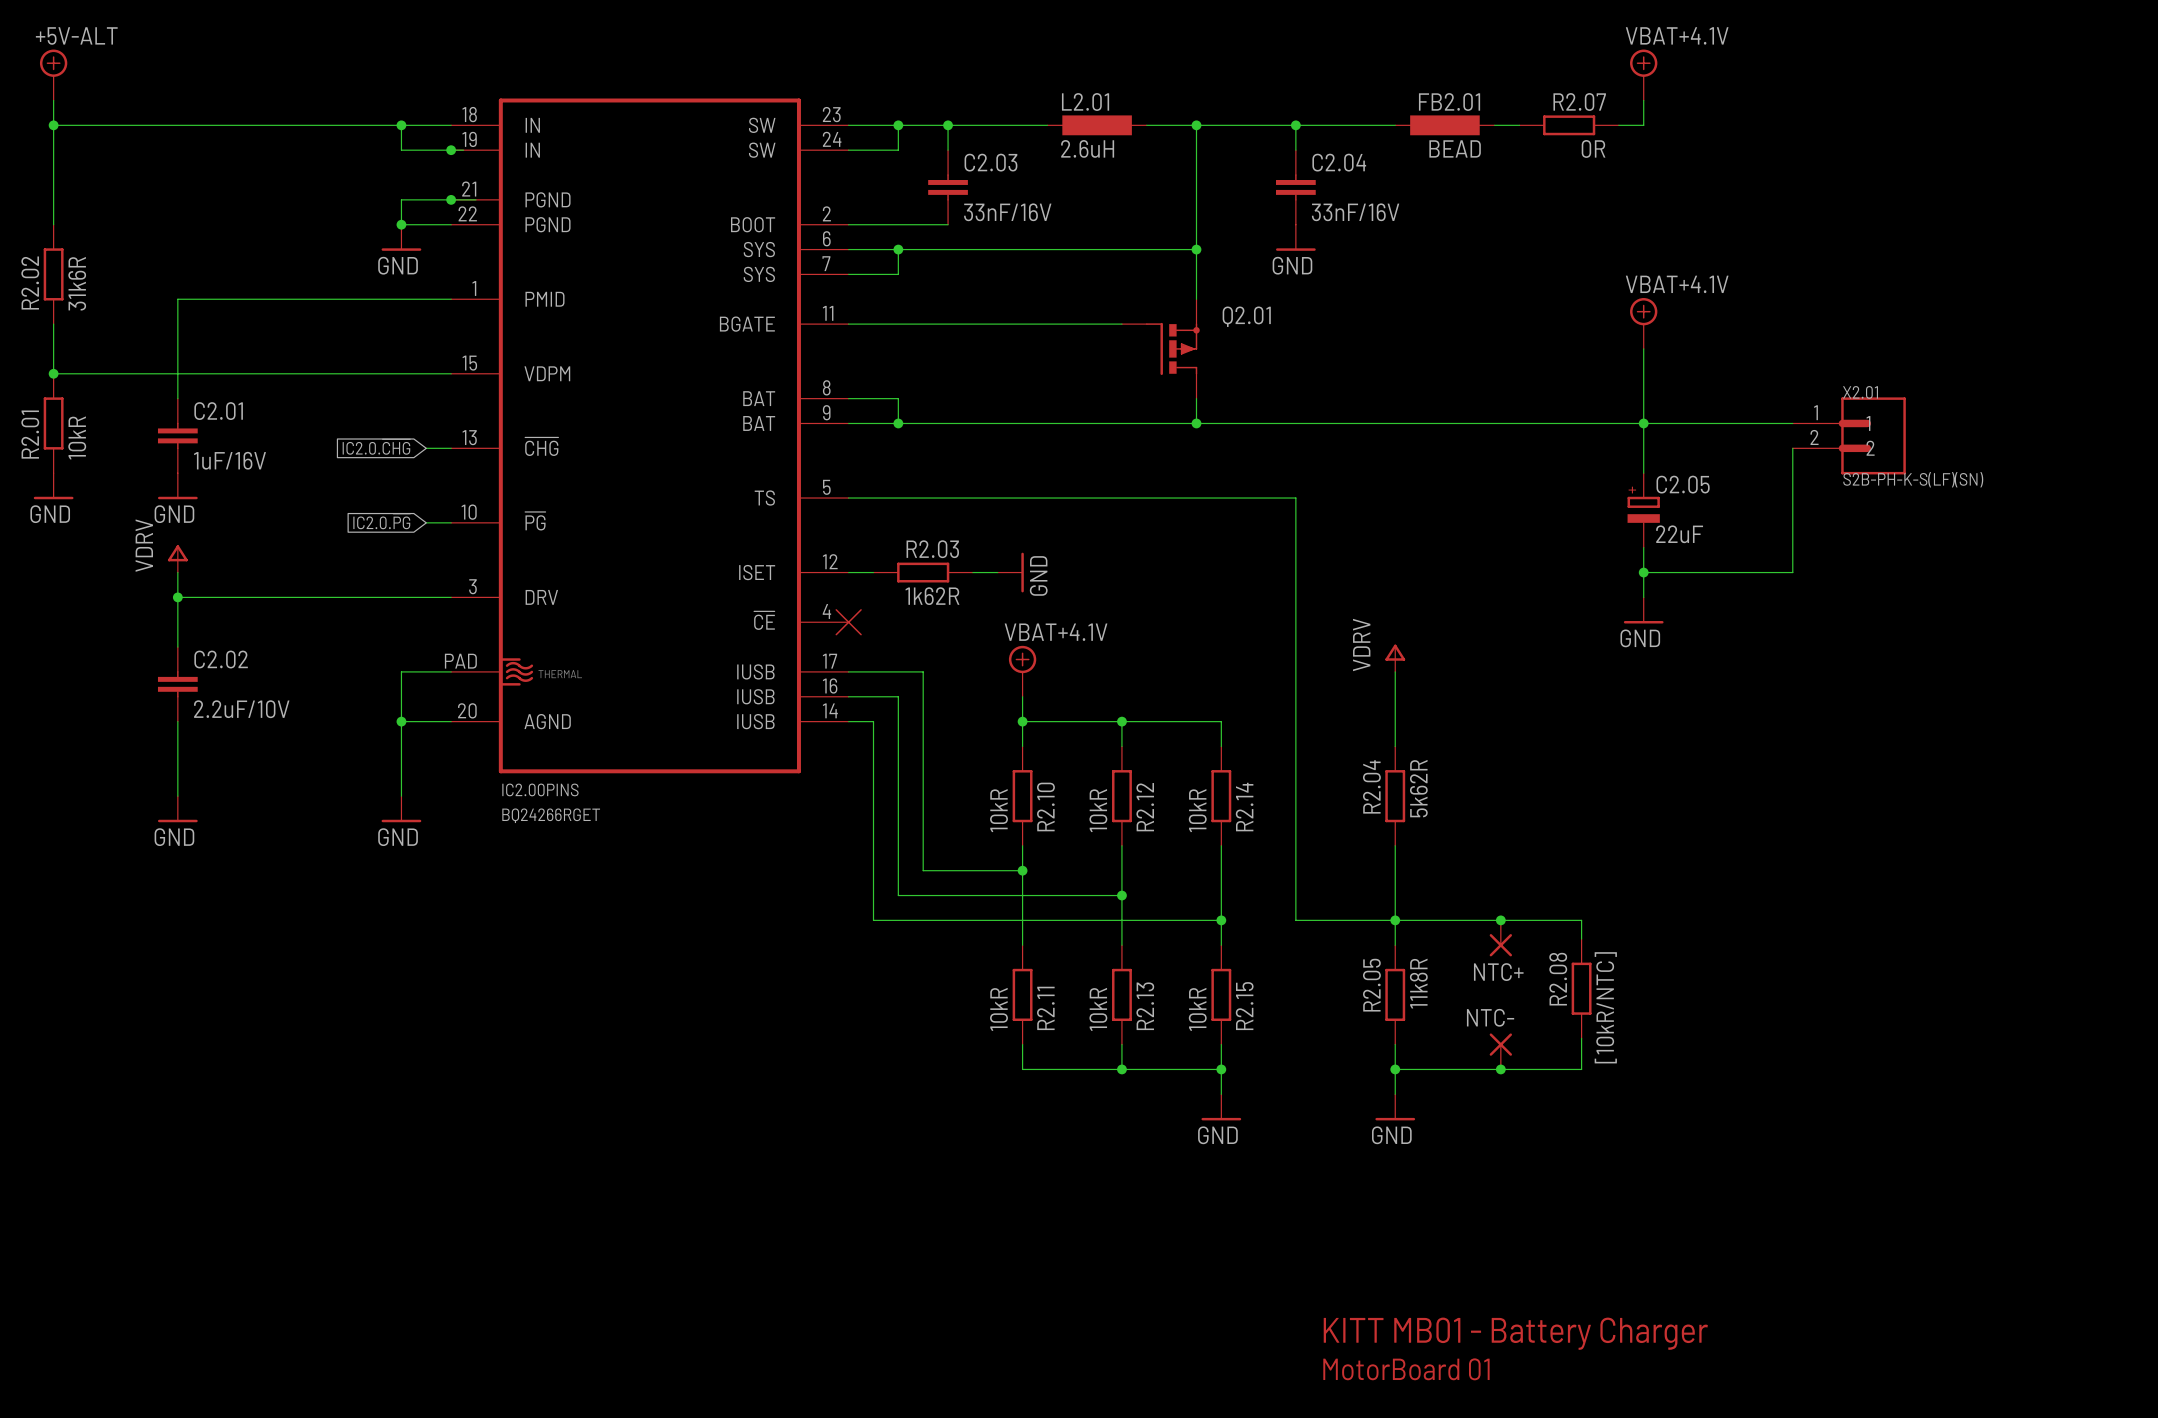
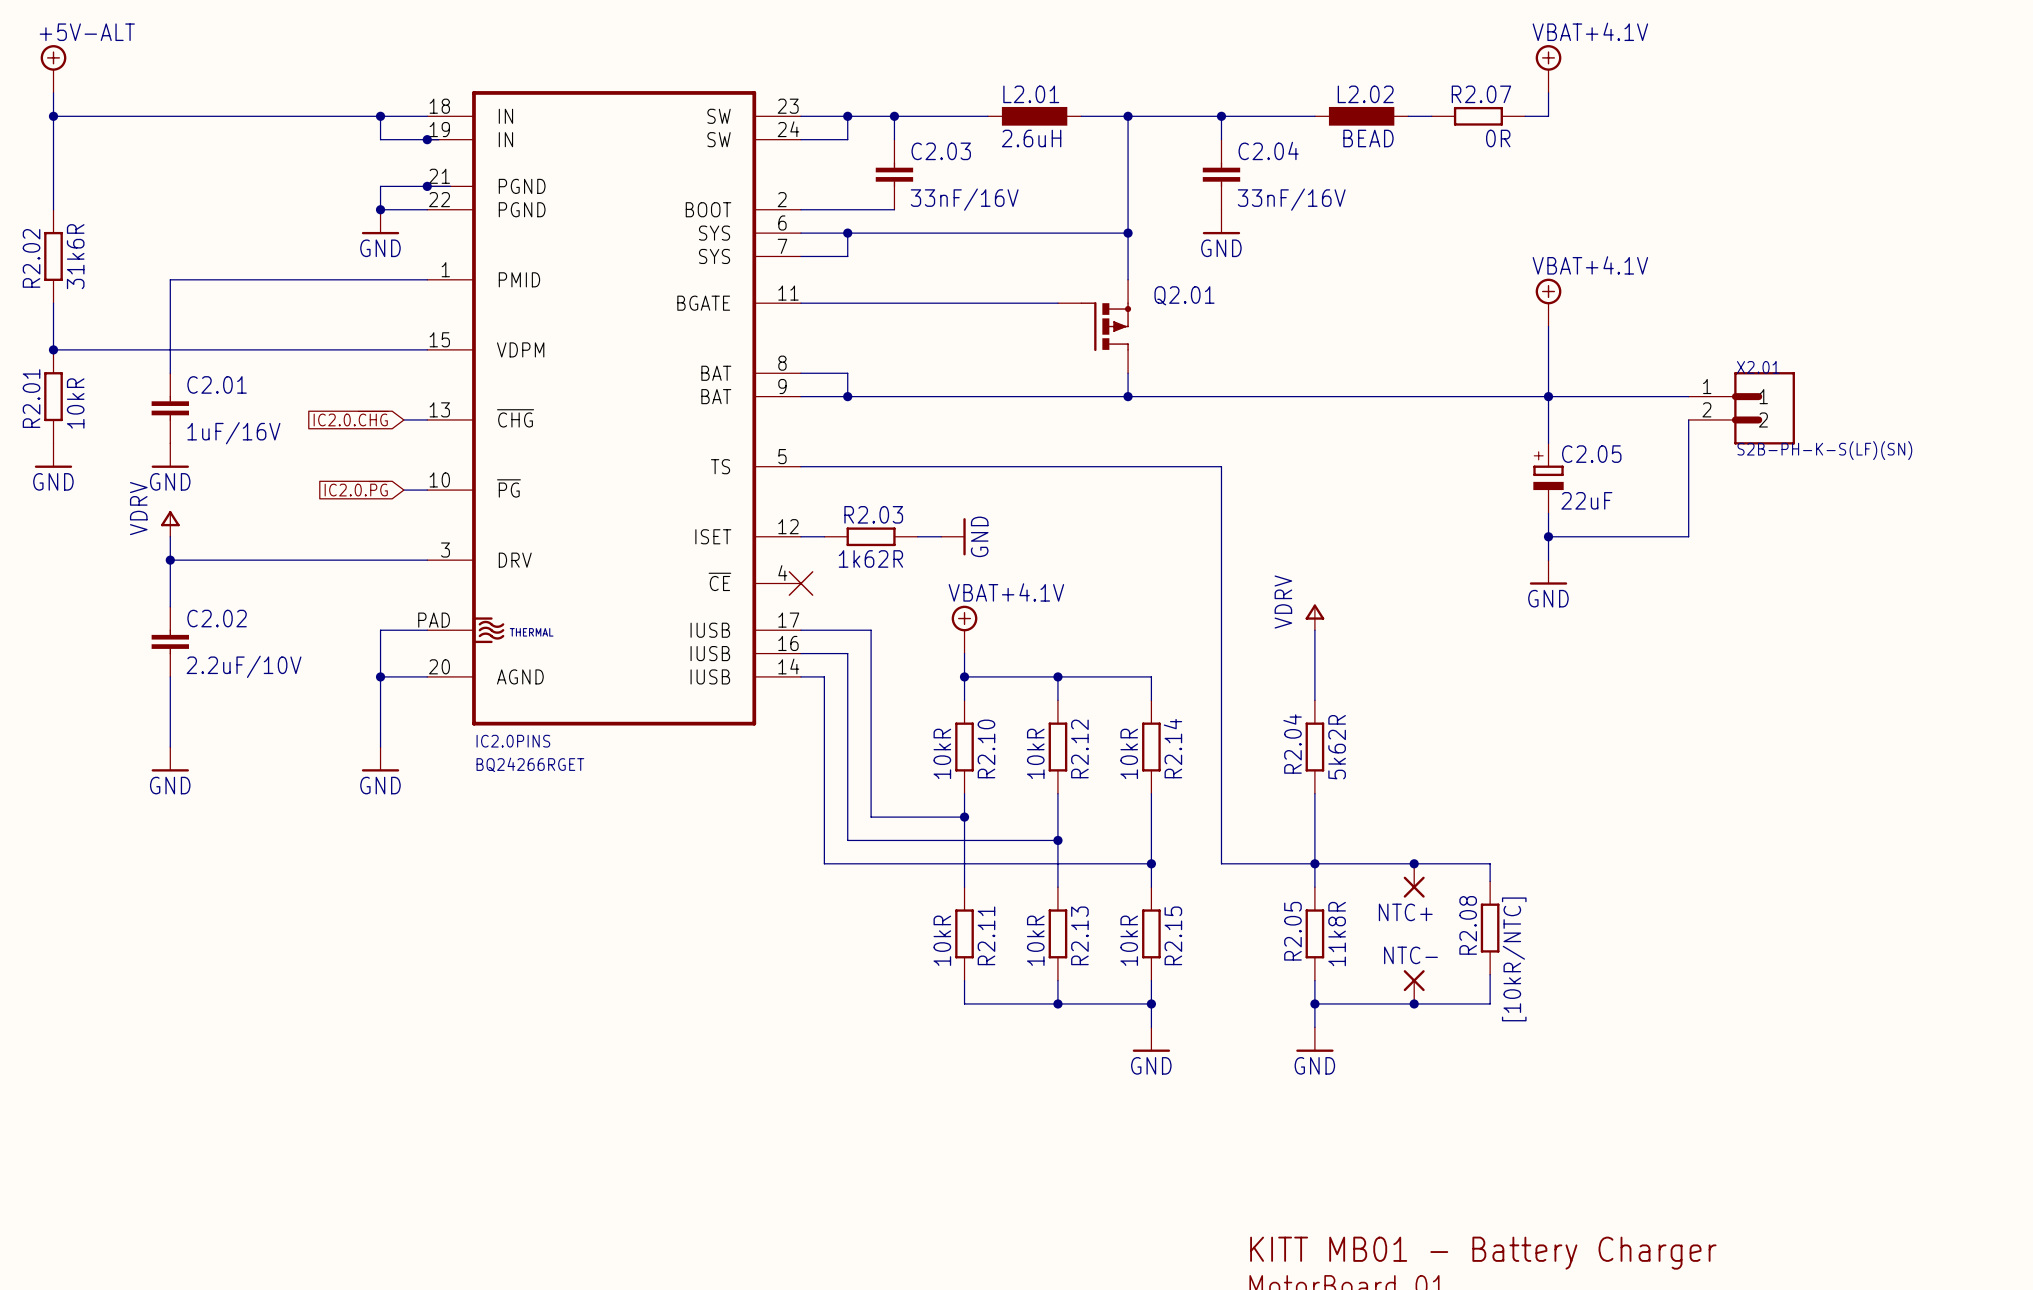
FB2.01 name: FB2.01 (1449, 101) -> L2.02 (1365, 94)
IC2.00PINS name: IC2.00PINS (540, 789) -> IC2.0PINS (513, 741)

